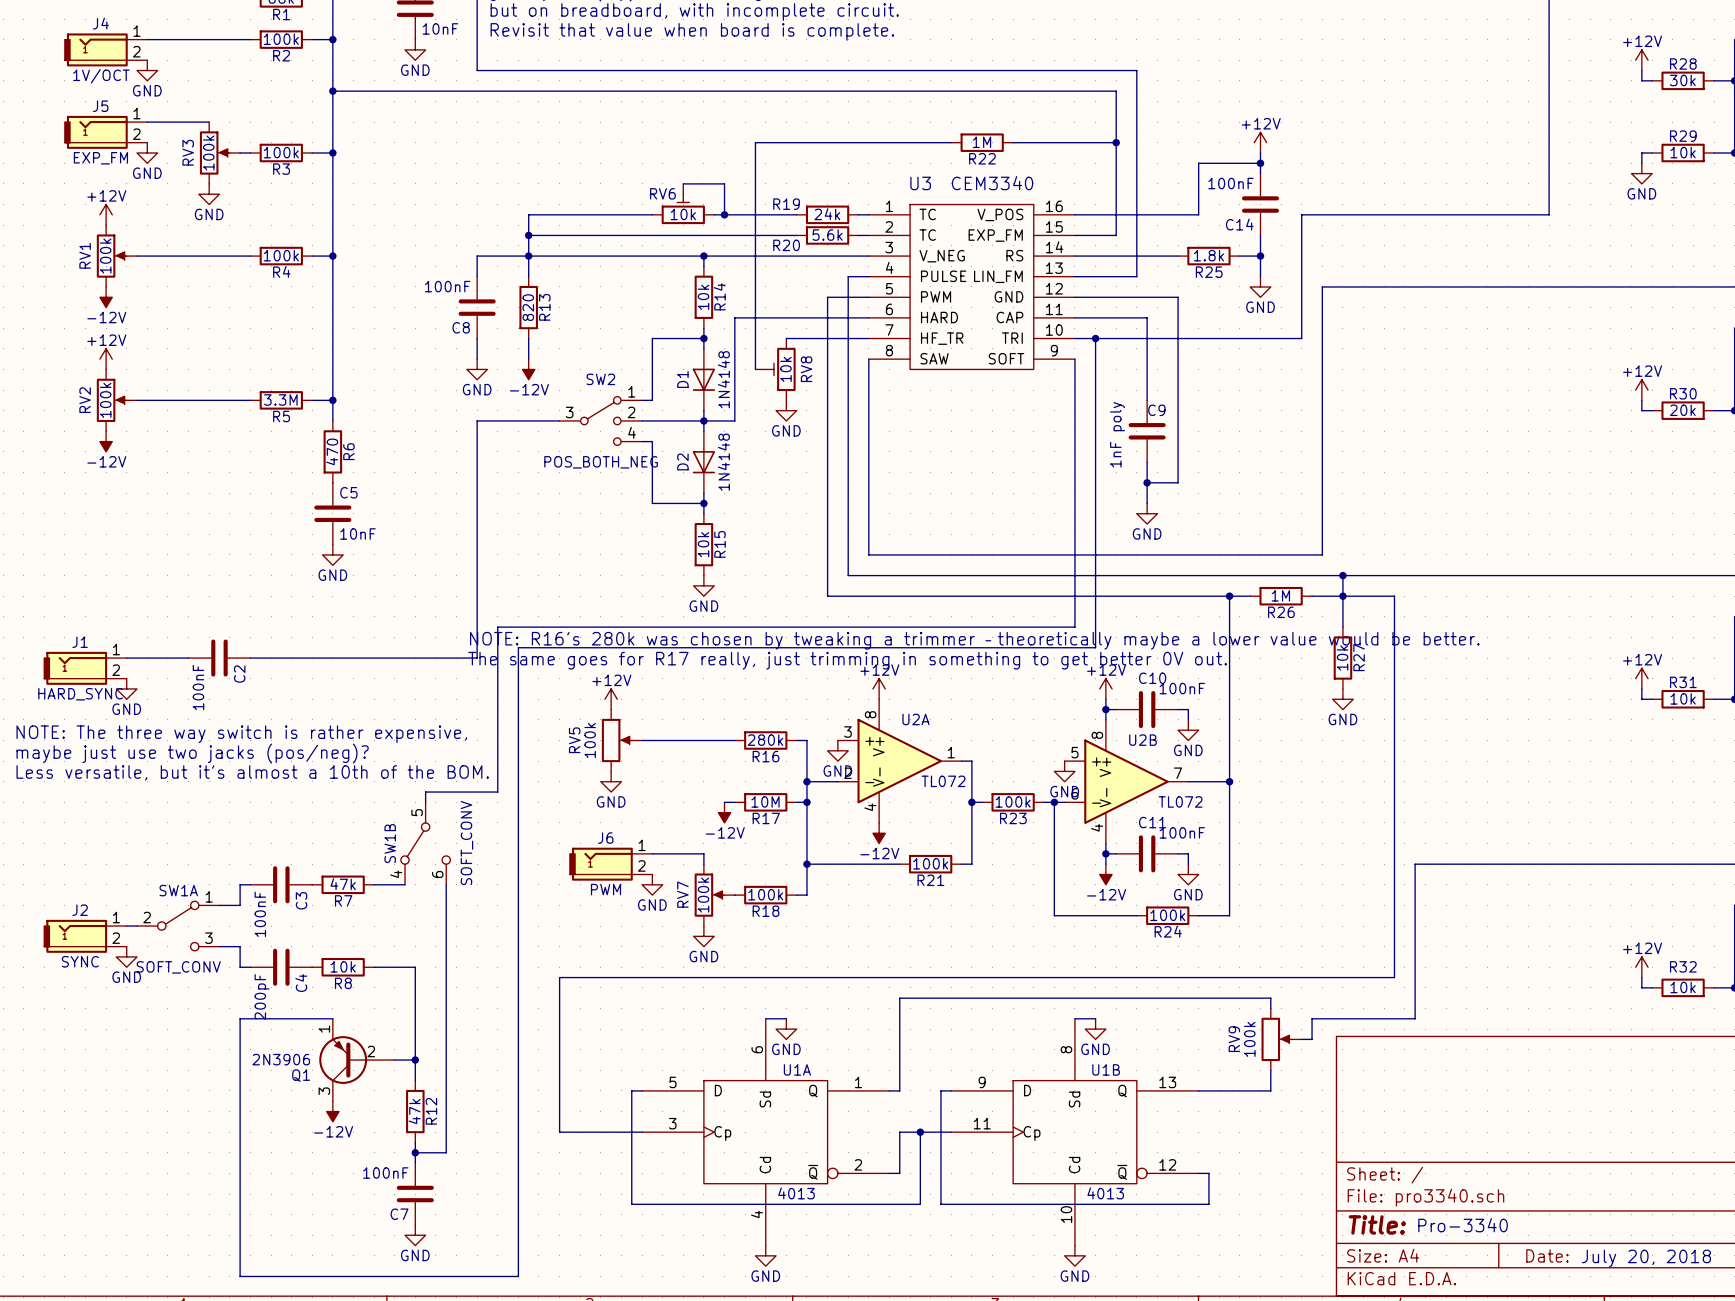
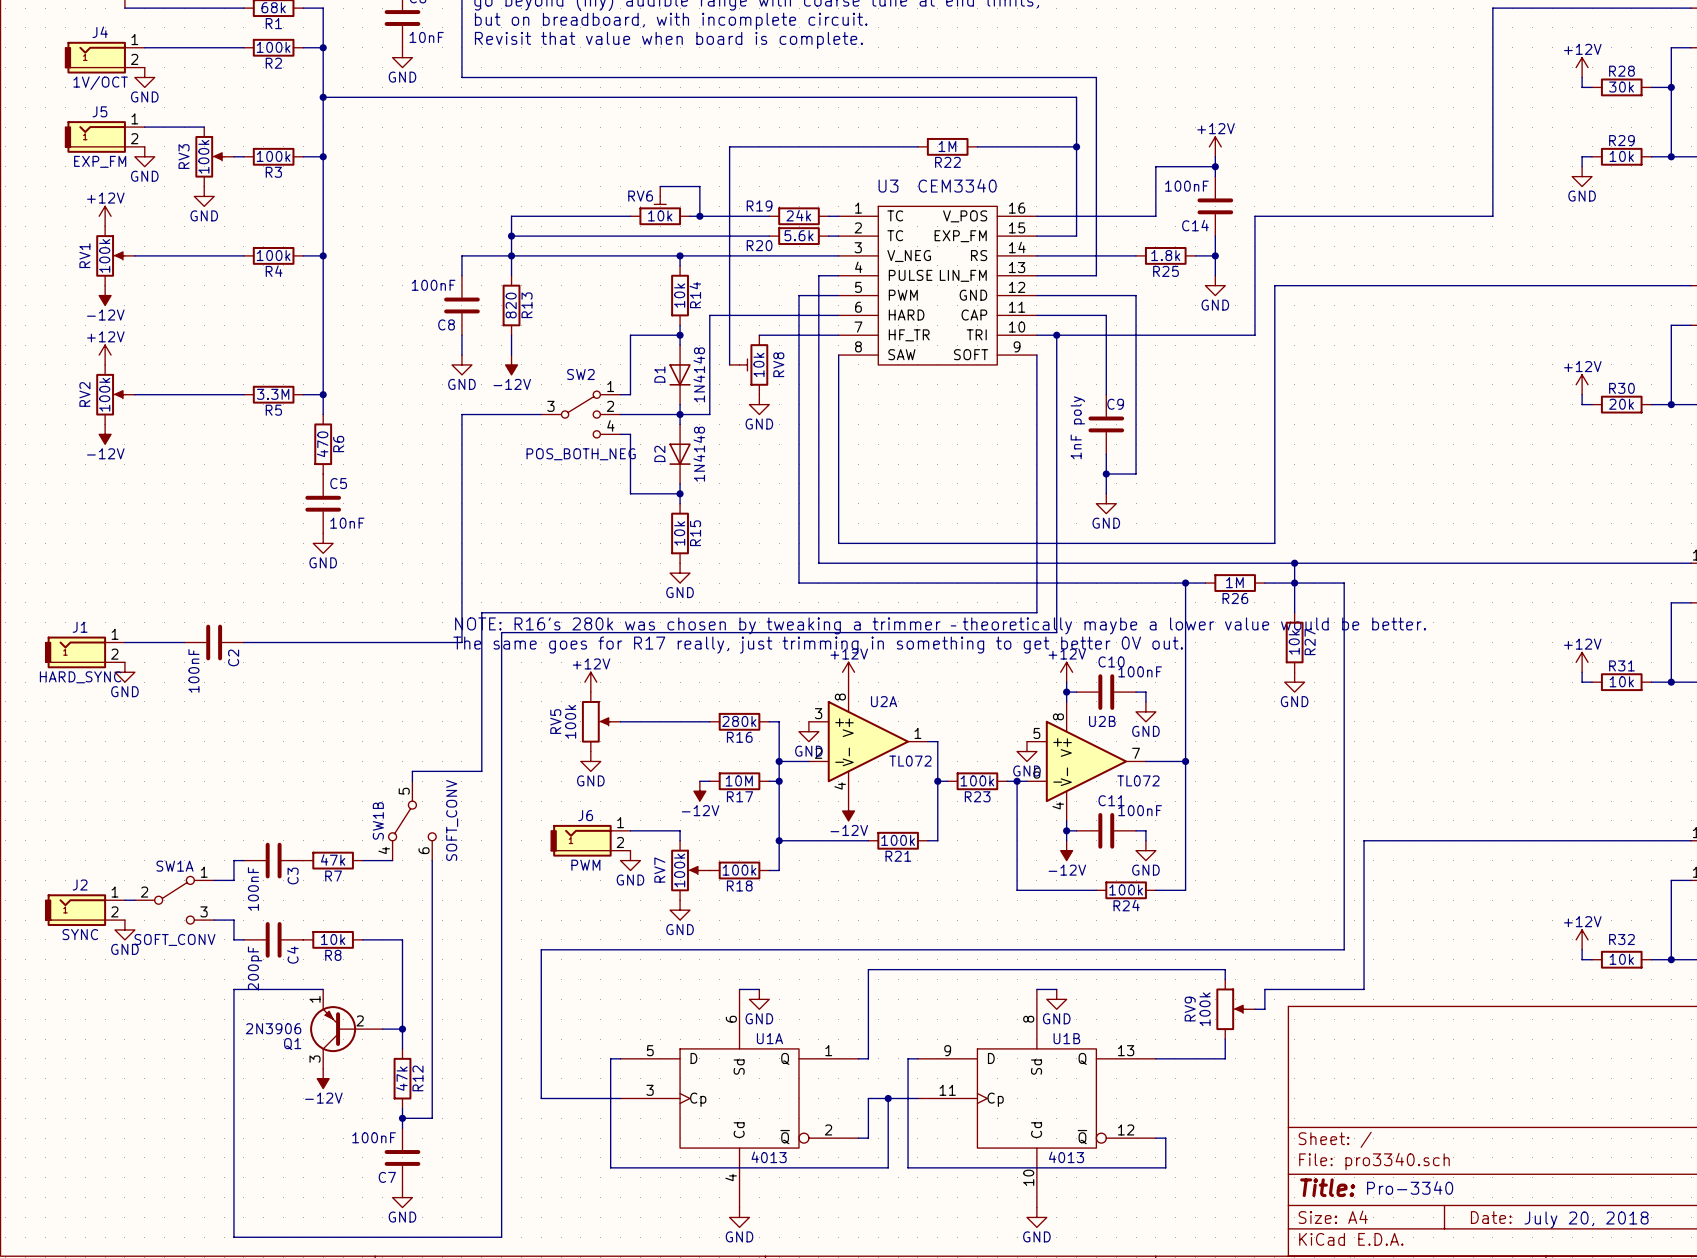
text: NOTE: The three way switch is rather expensive, (241, 734) -> none
text: maybe just use two jacks (pos/neg)? (192, 753) -> none
text: Less versatile, but it's almost a 10th of the BOM. (252, 772) -> none

